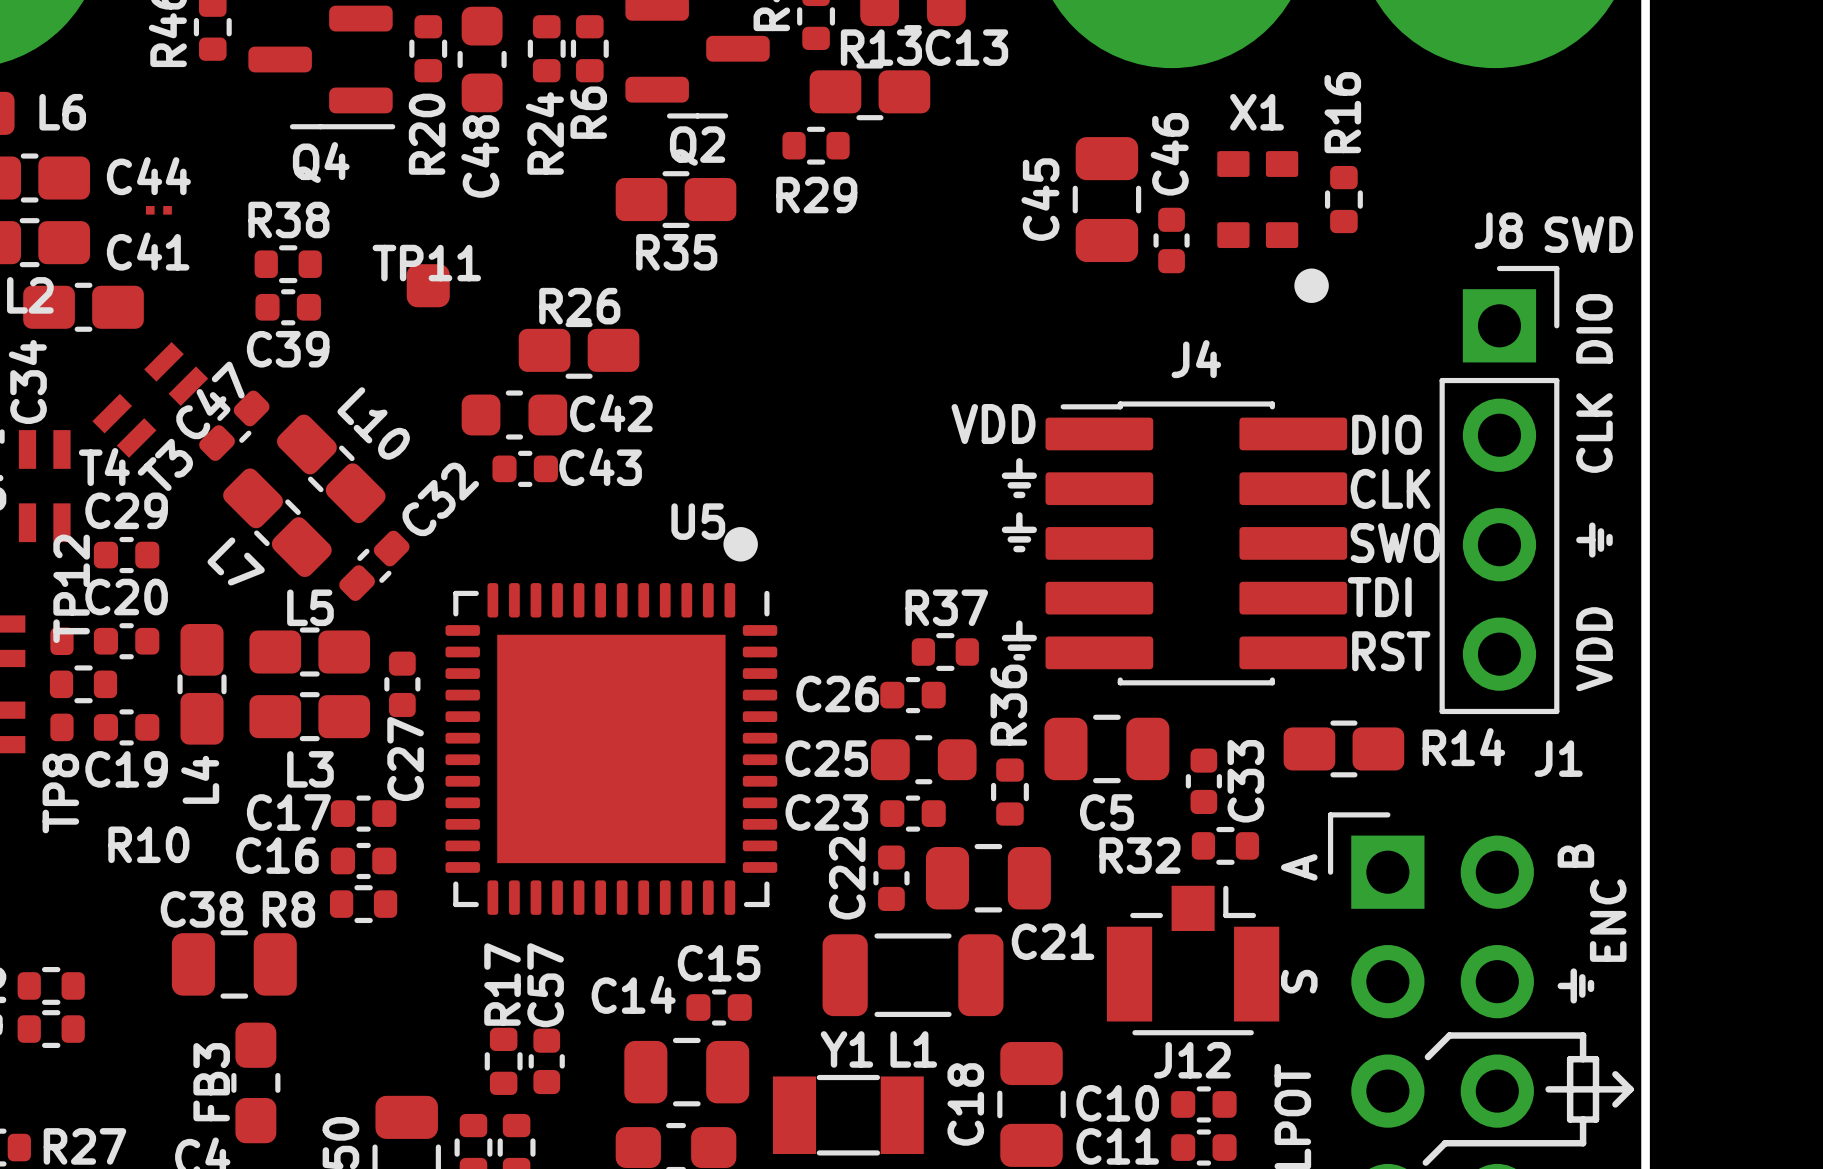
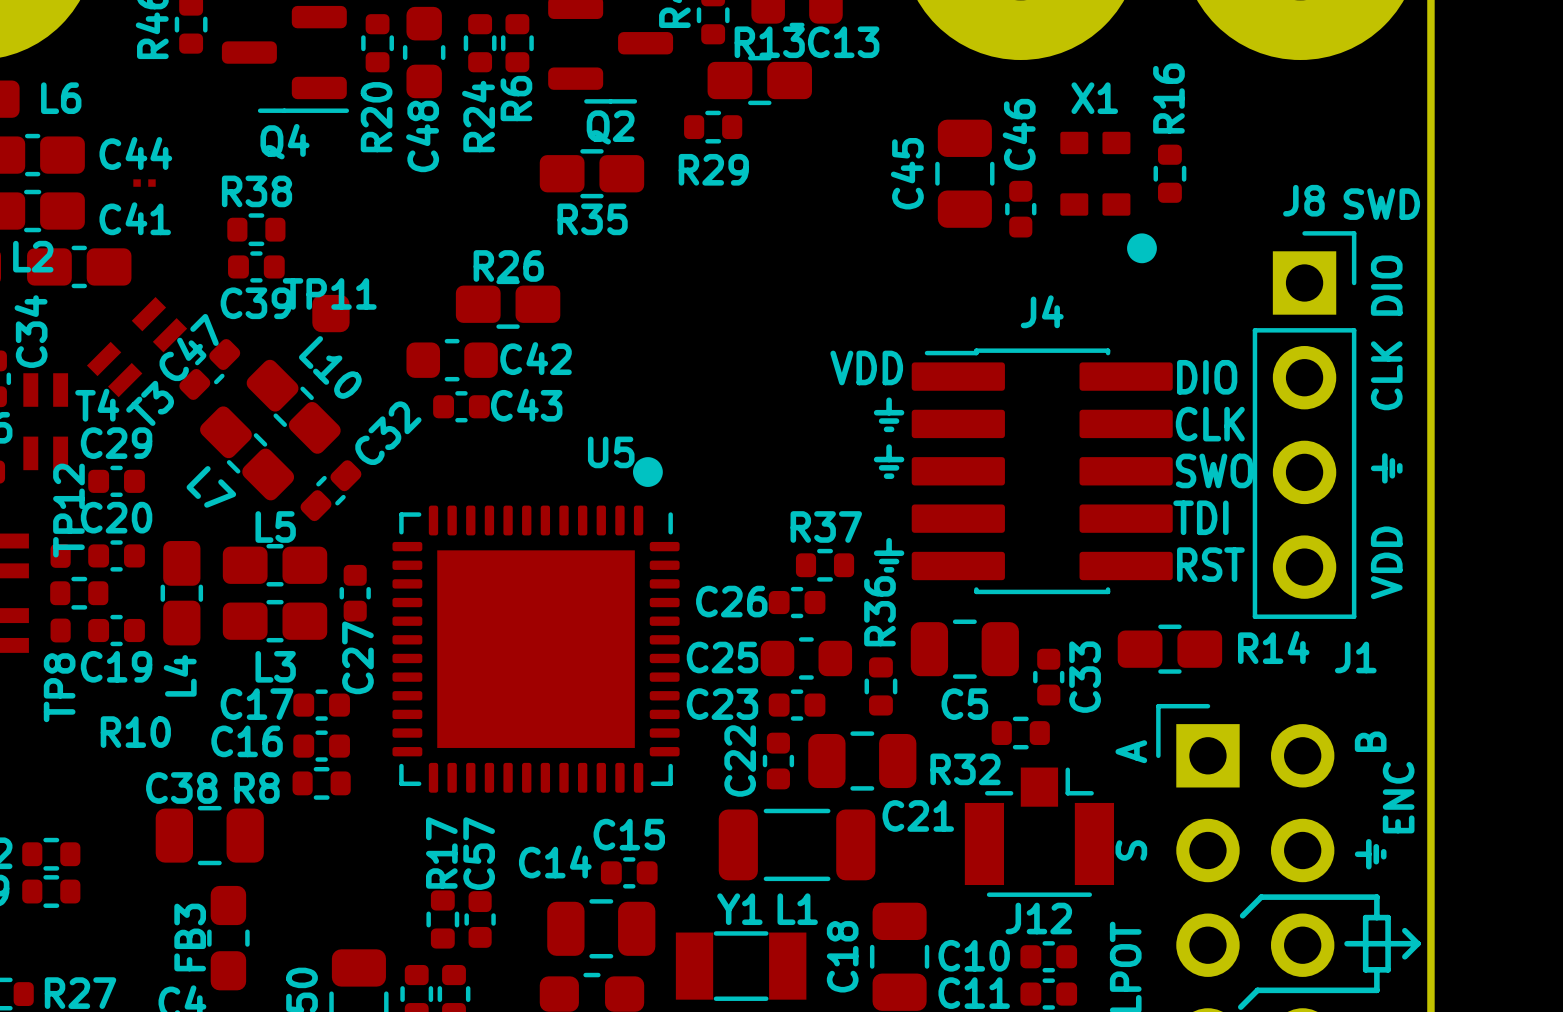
TP11 position: (428, 285) -> (330, 313)
R32 position: (1225, 845) -> (1020, 733)
R32 name position: R32 (1139, 855) -> R32 (965, 769)

